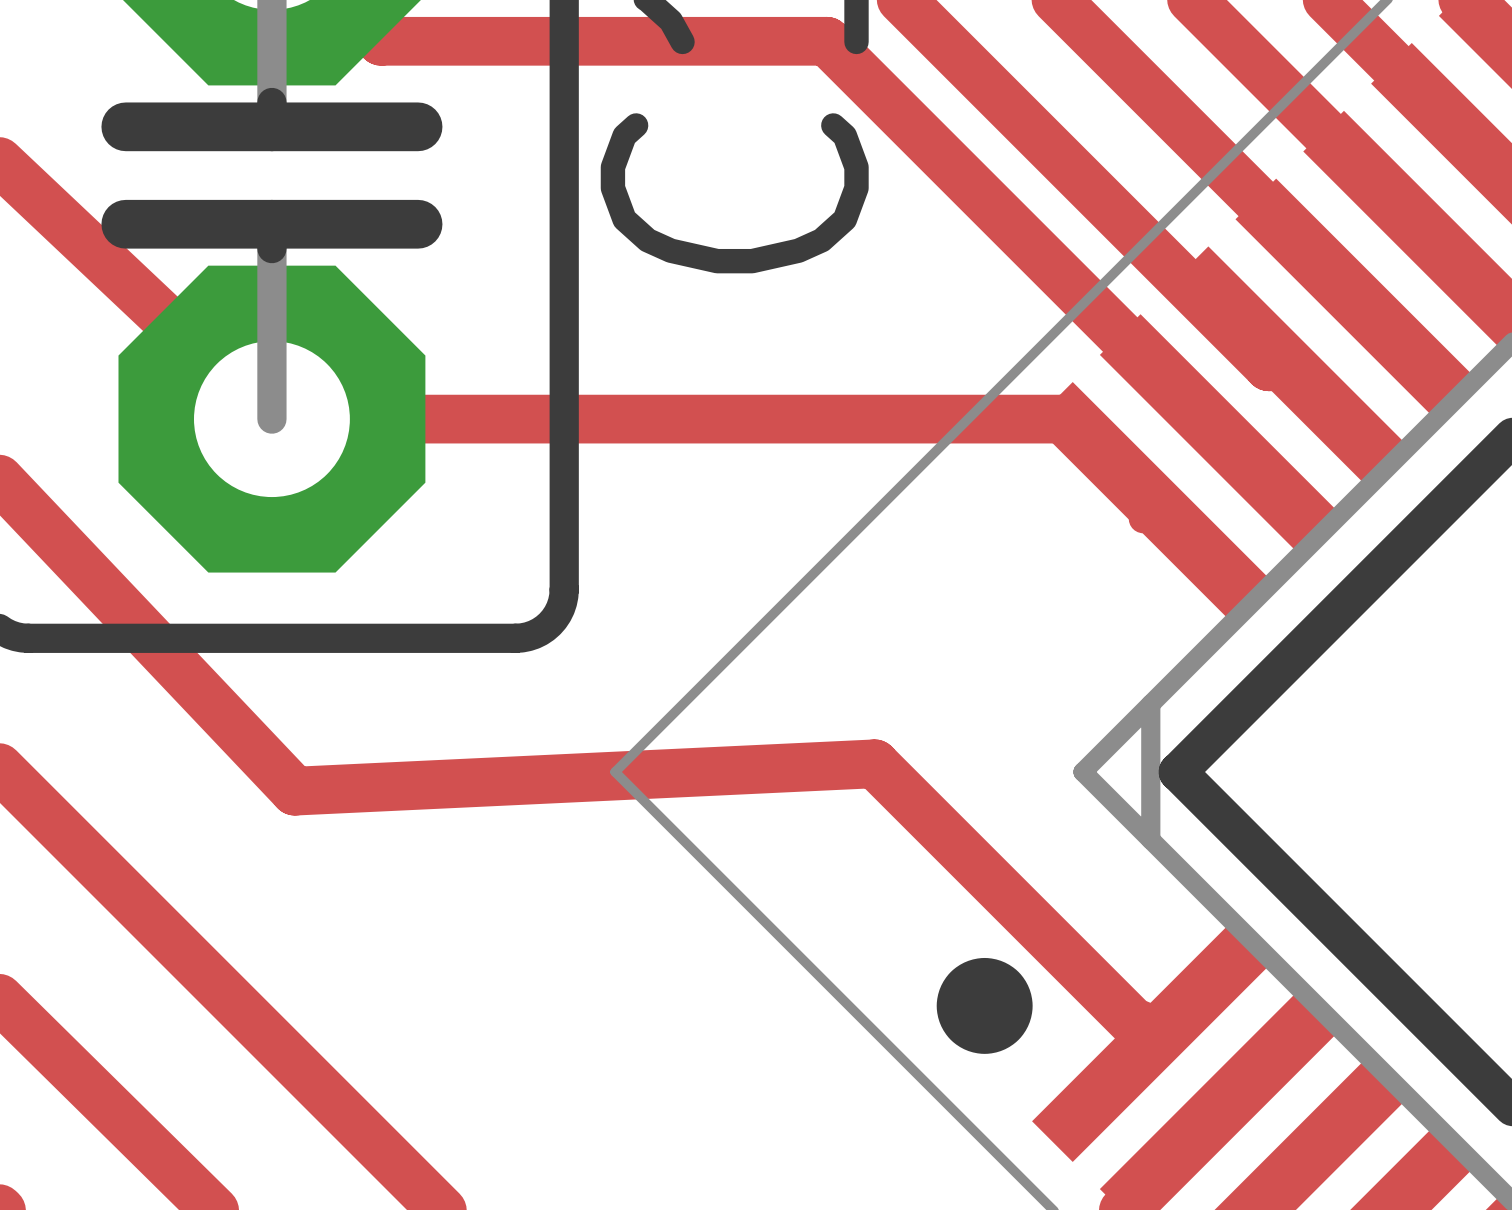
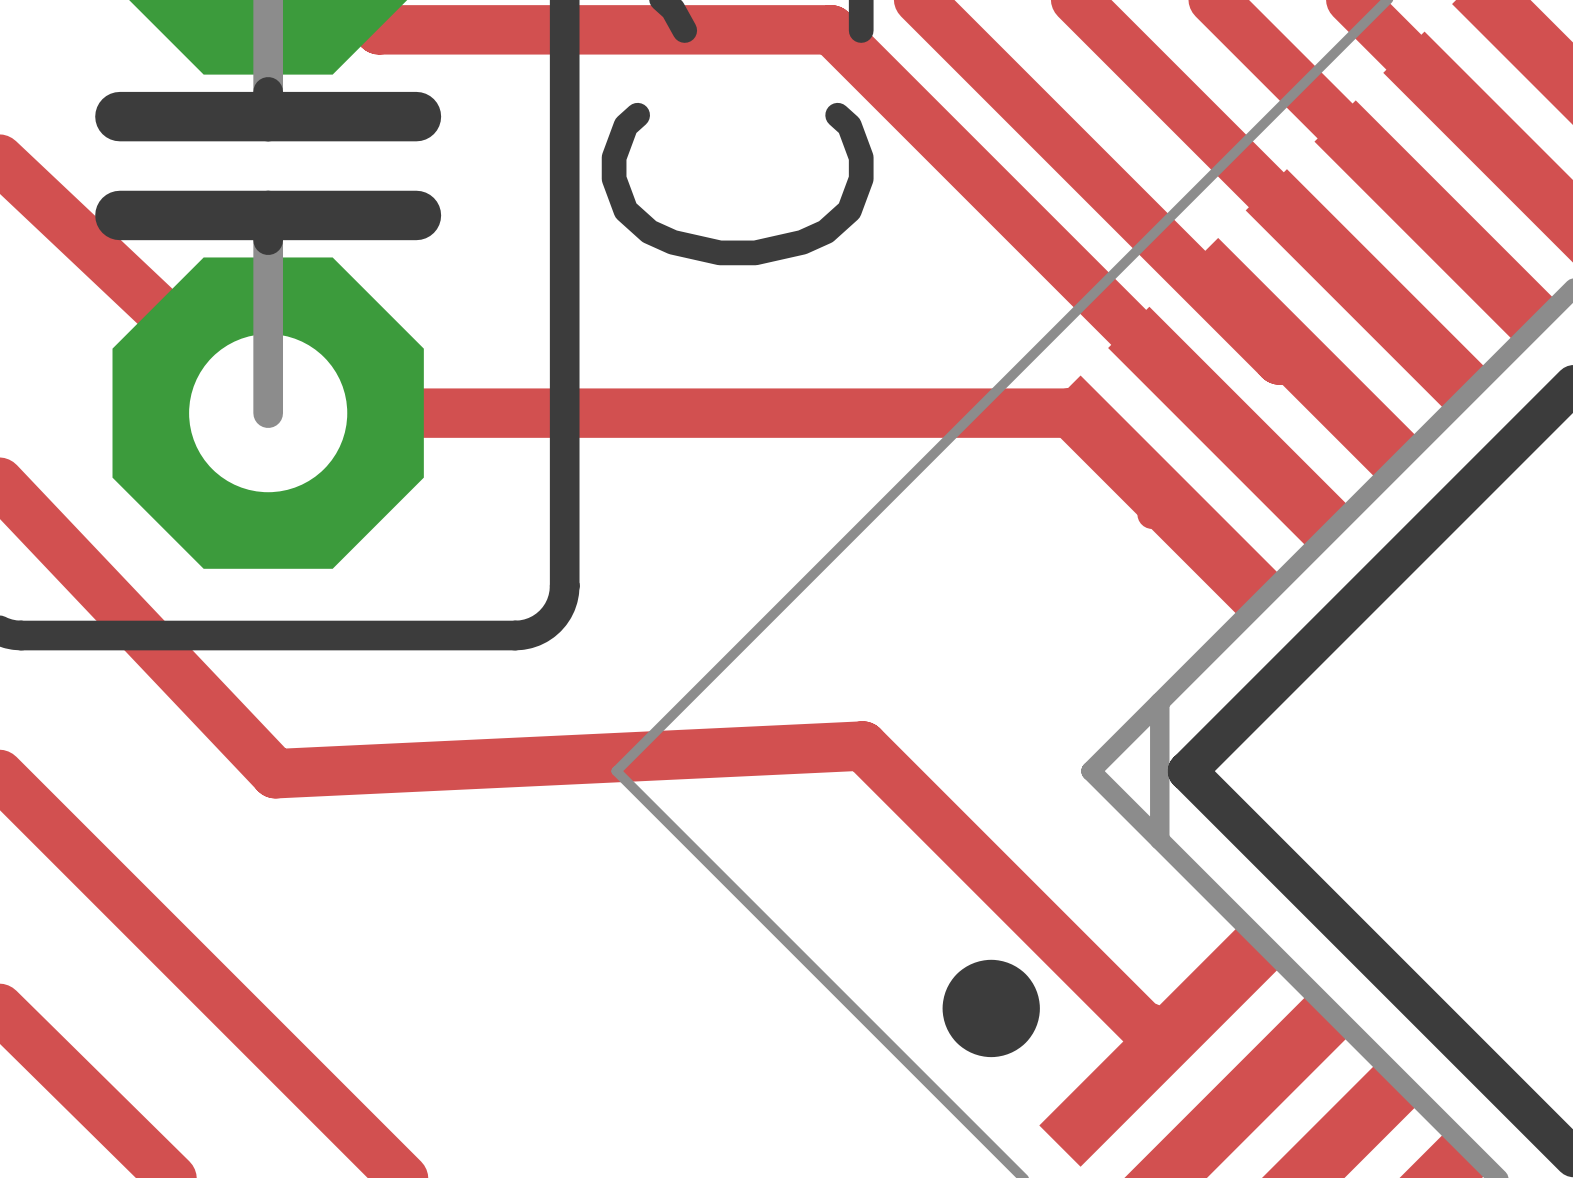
track: (874, 763) (294, 791) (279, 774) -> (879, 762) (862, 746) (275, 773)

